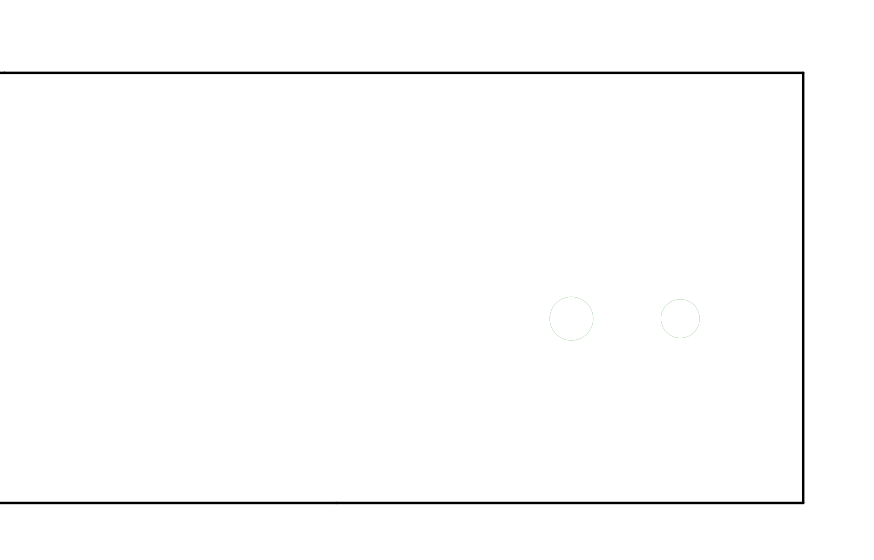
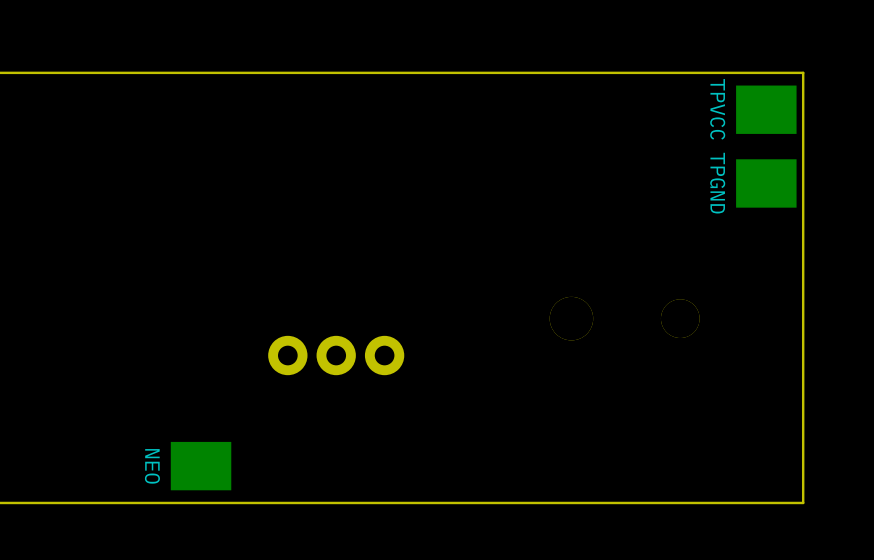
part: none -> TPVCC (766, 109)
part: none -> TPGND (766, 183)
part: none -> (336, 355)
part: none -> NEO (201, 466)

